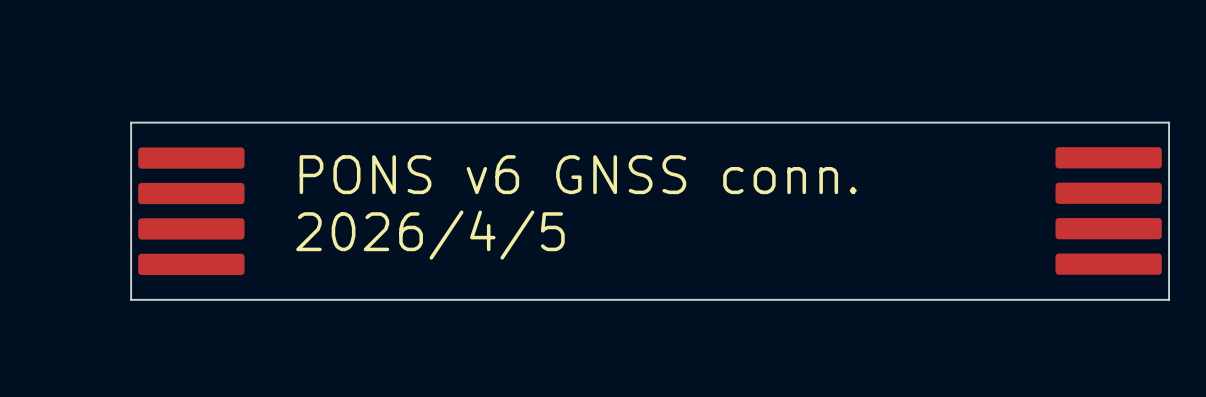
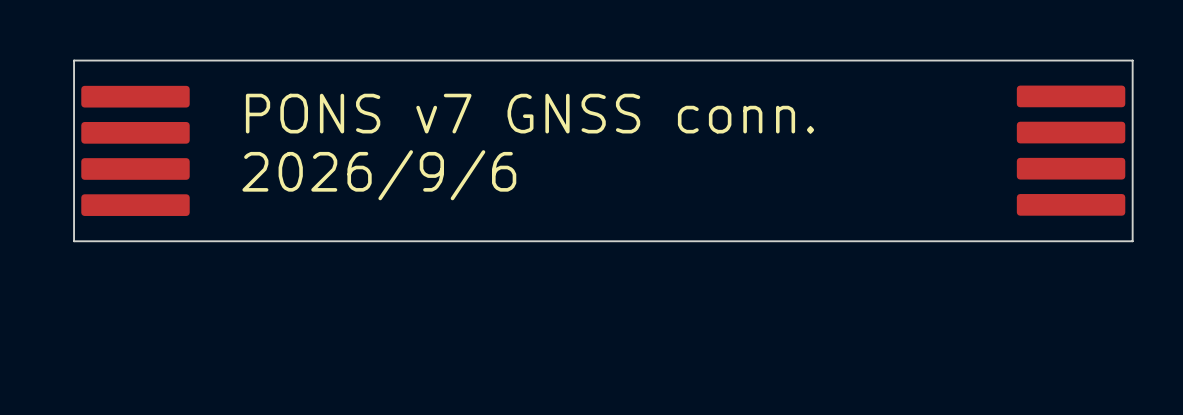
text: PONS v6 GNSS conn. (578, 174) -> PONS v7 GNSS conn. (529, 113)
text: 2026/4/5 (430, 235) -> 2026/9/6 (379, 175)

